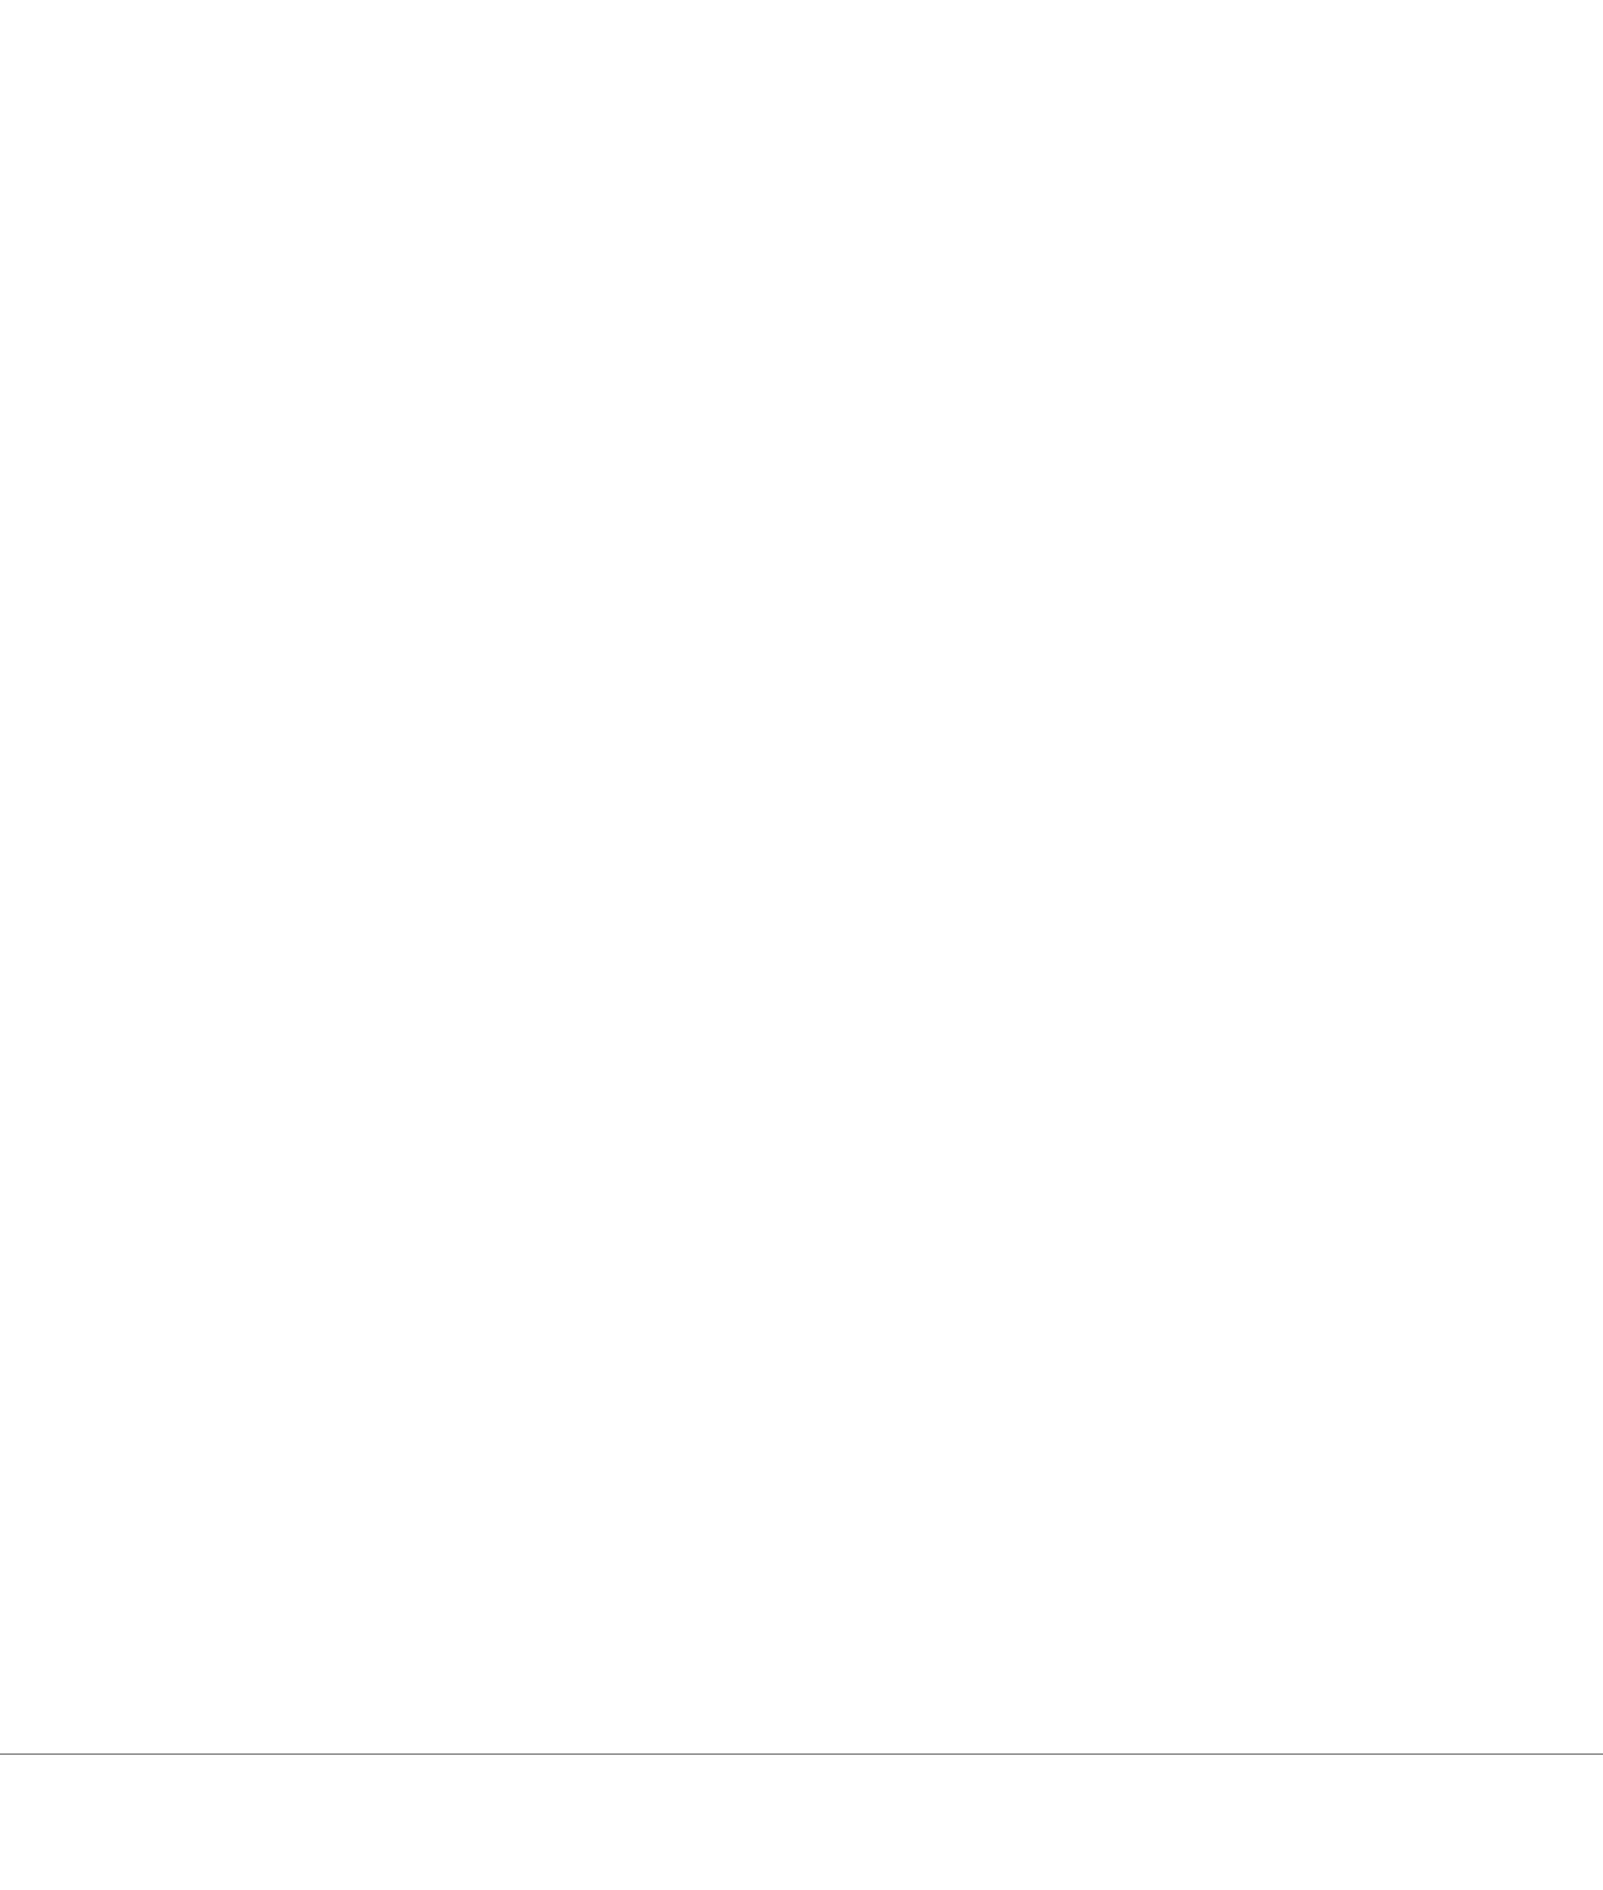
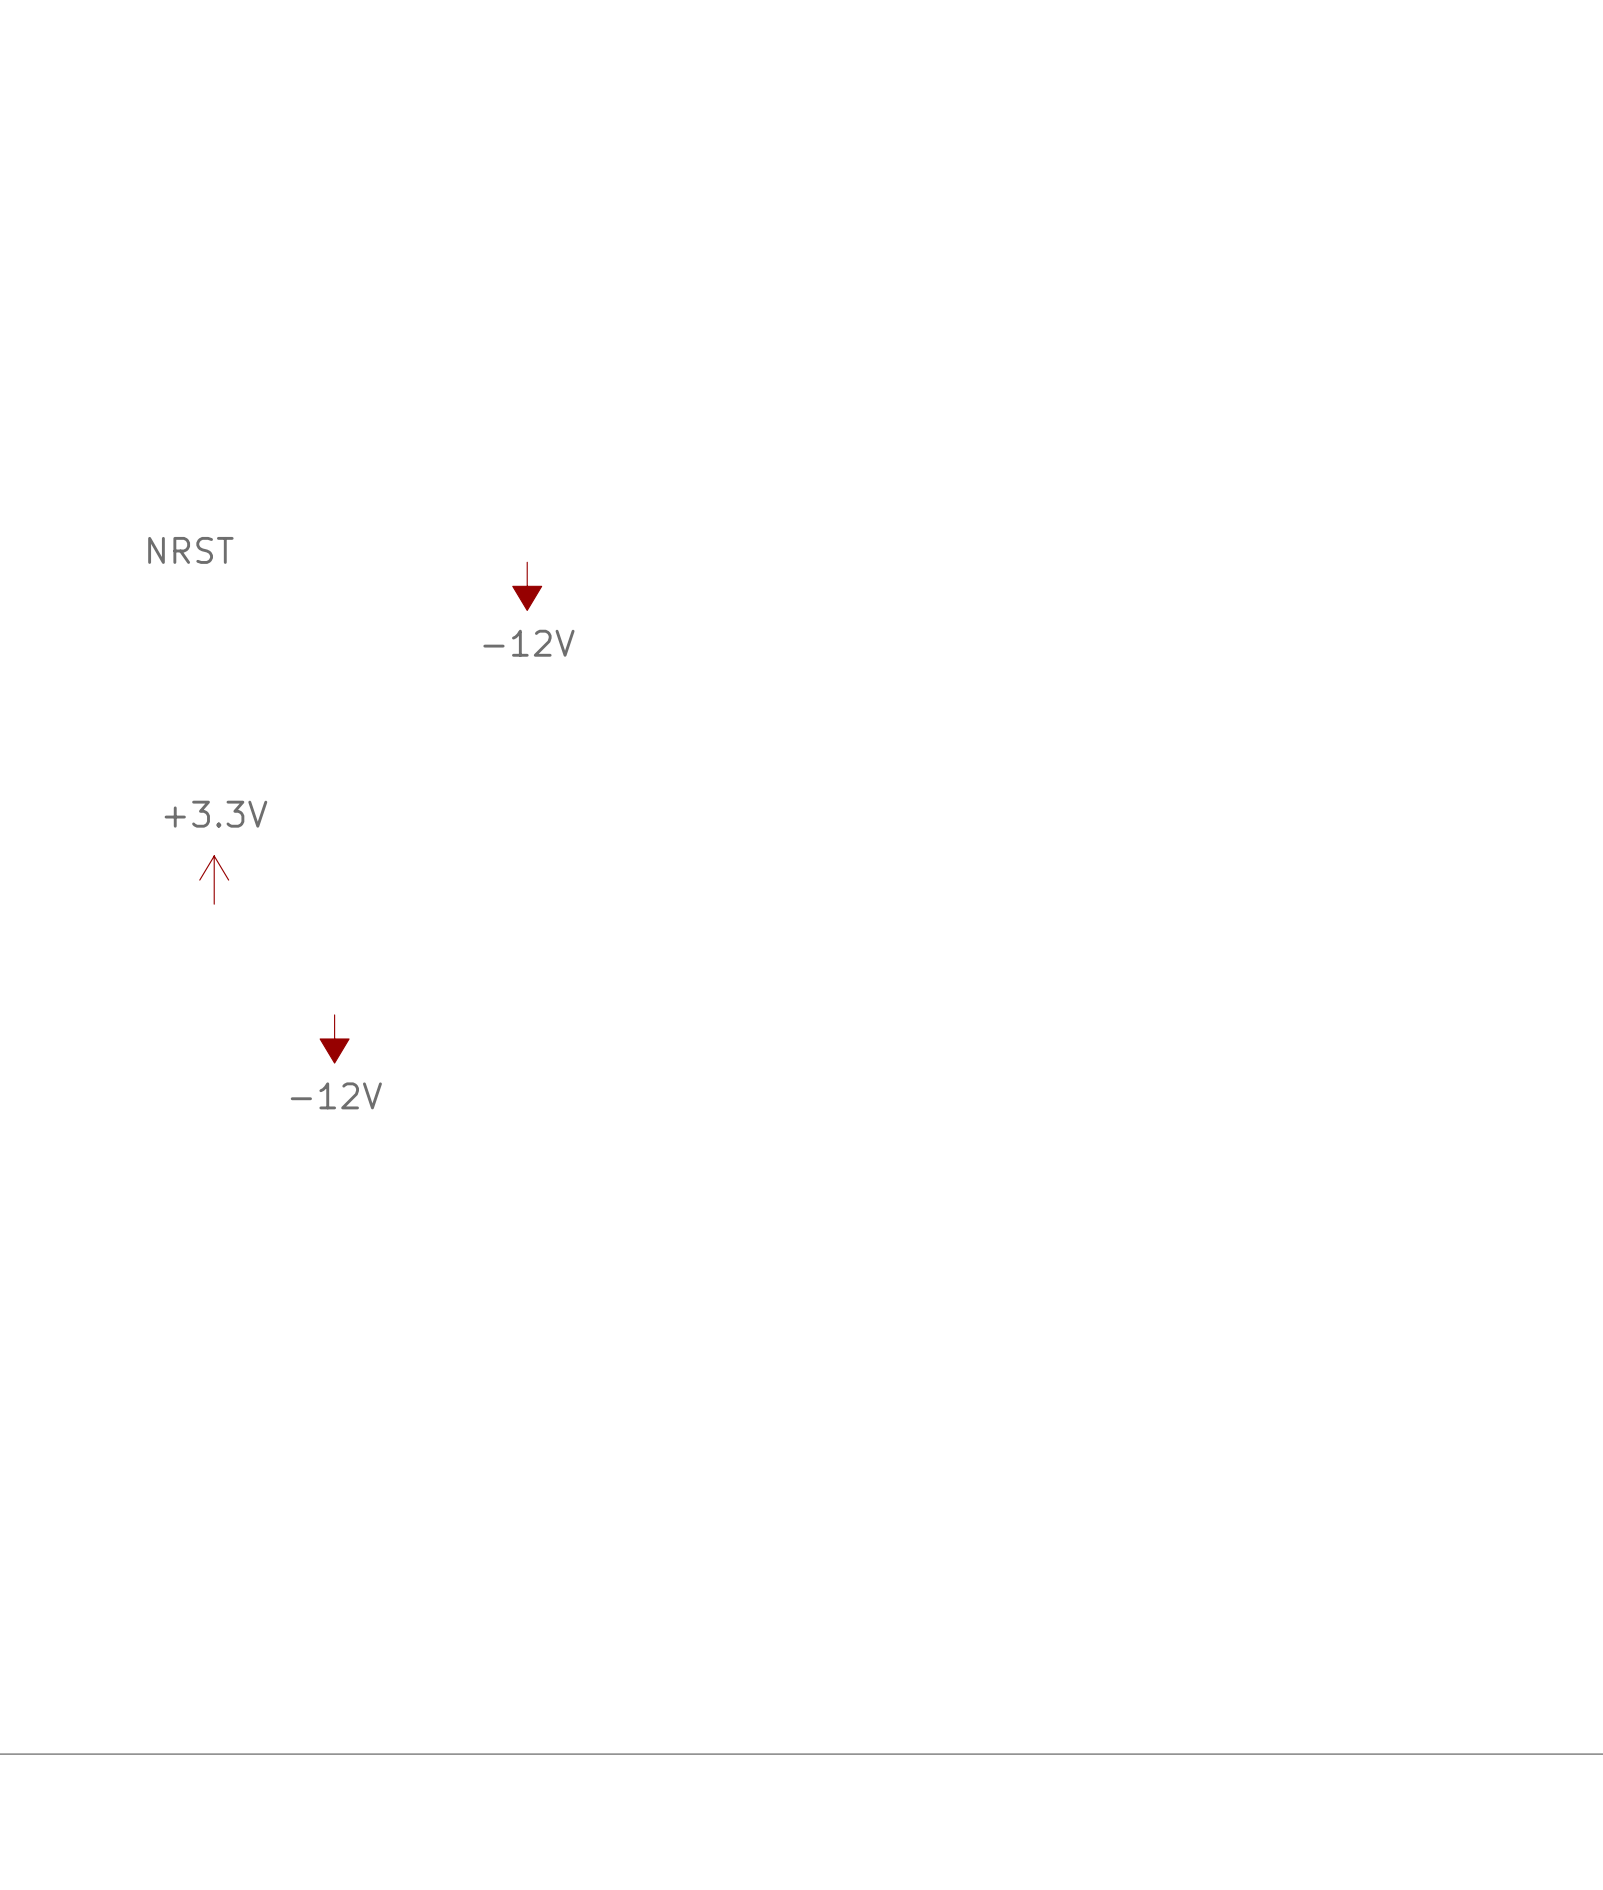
label: none -> NRST (190, 550)
power symbol: none -> -12V (527, 586)
power symbol: none -> +3.3V (214, 880)
power symbol: none -> -12V (334, 1038)

